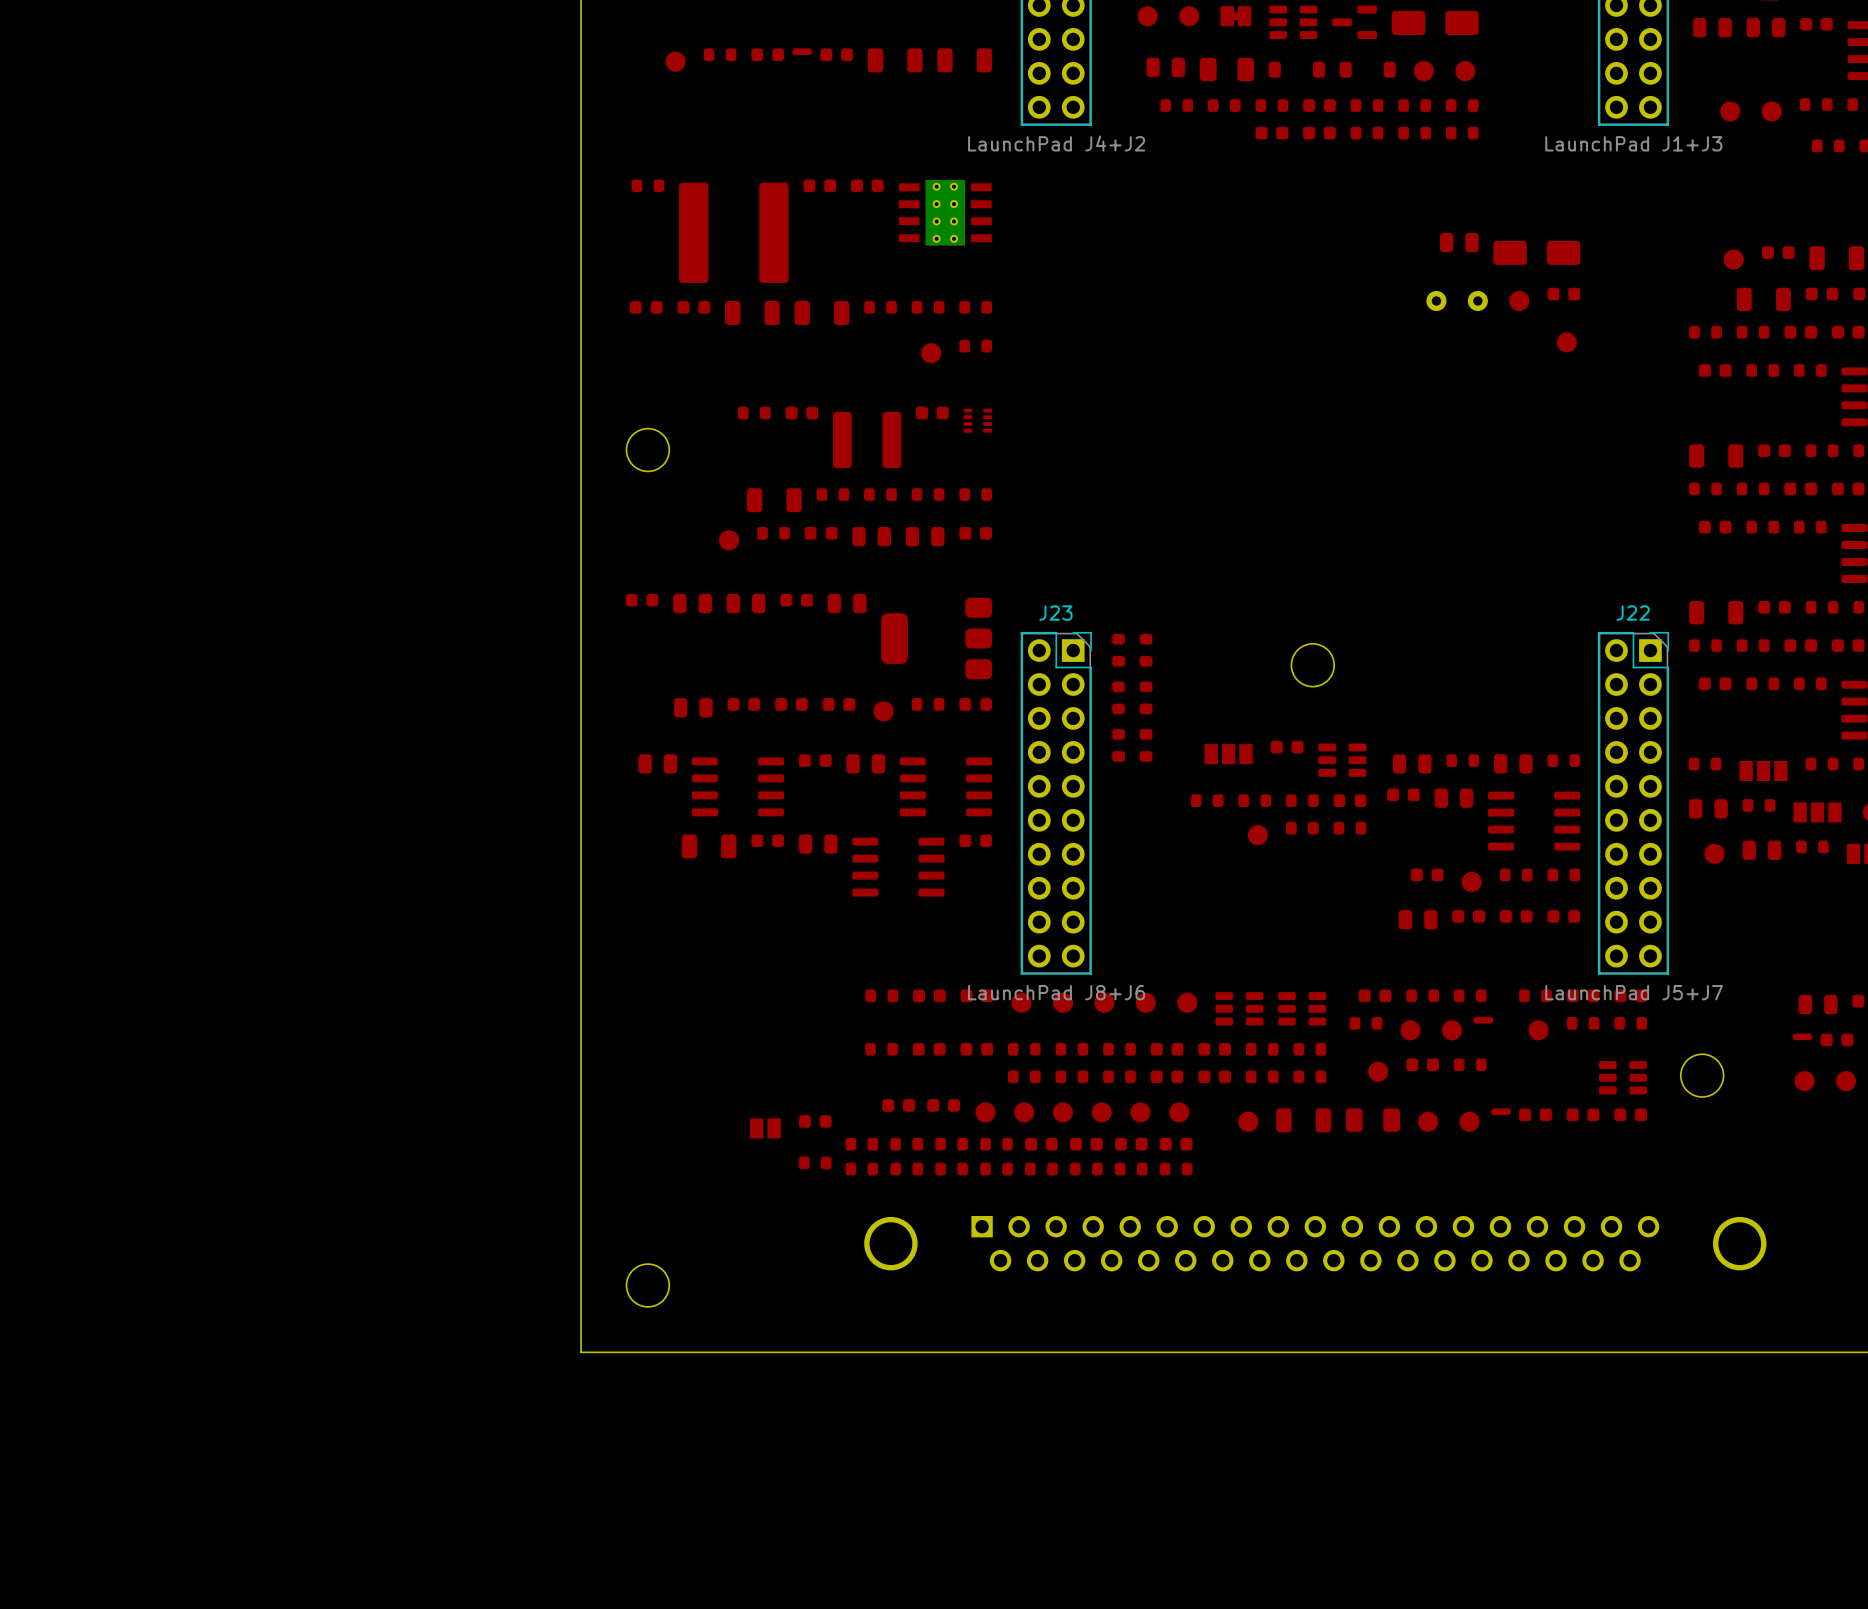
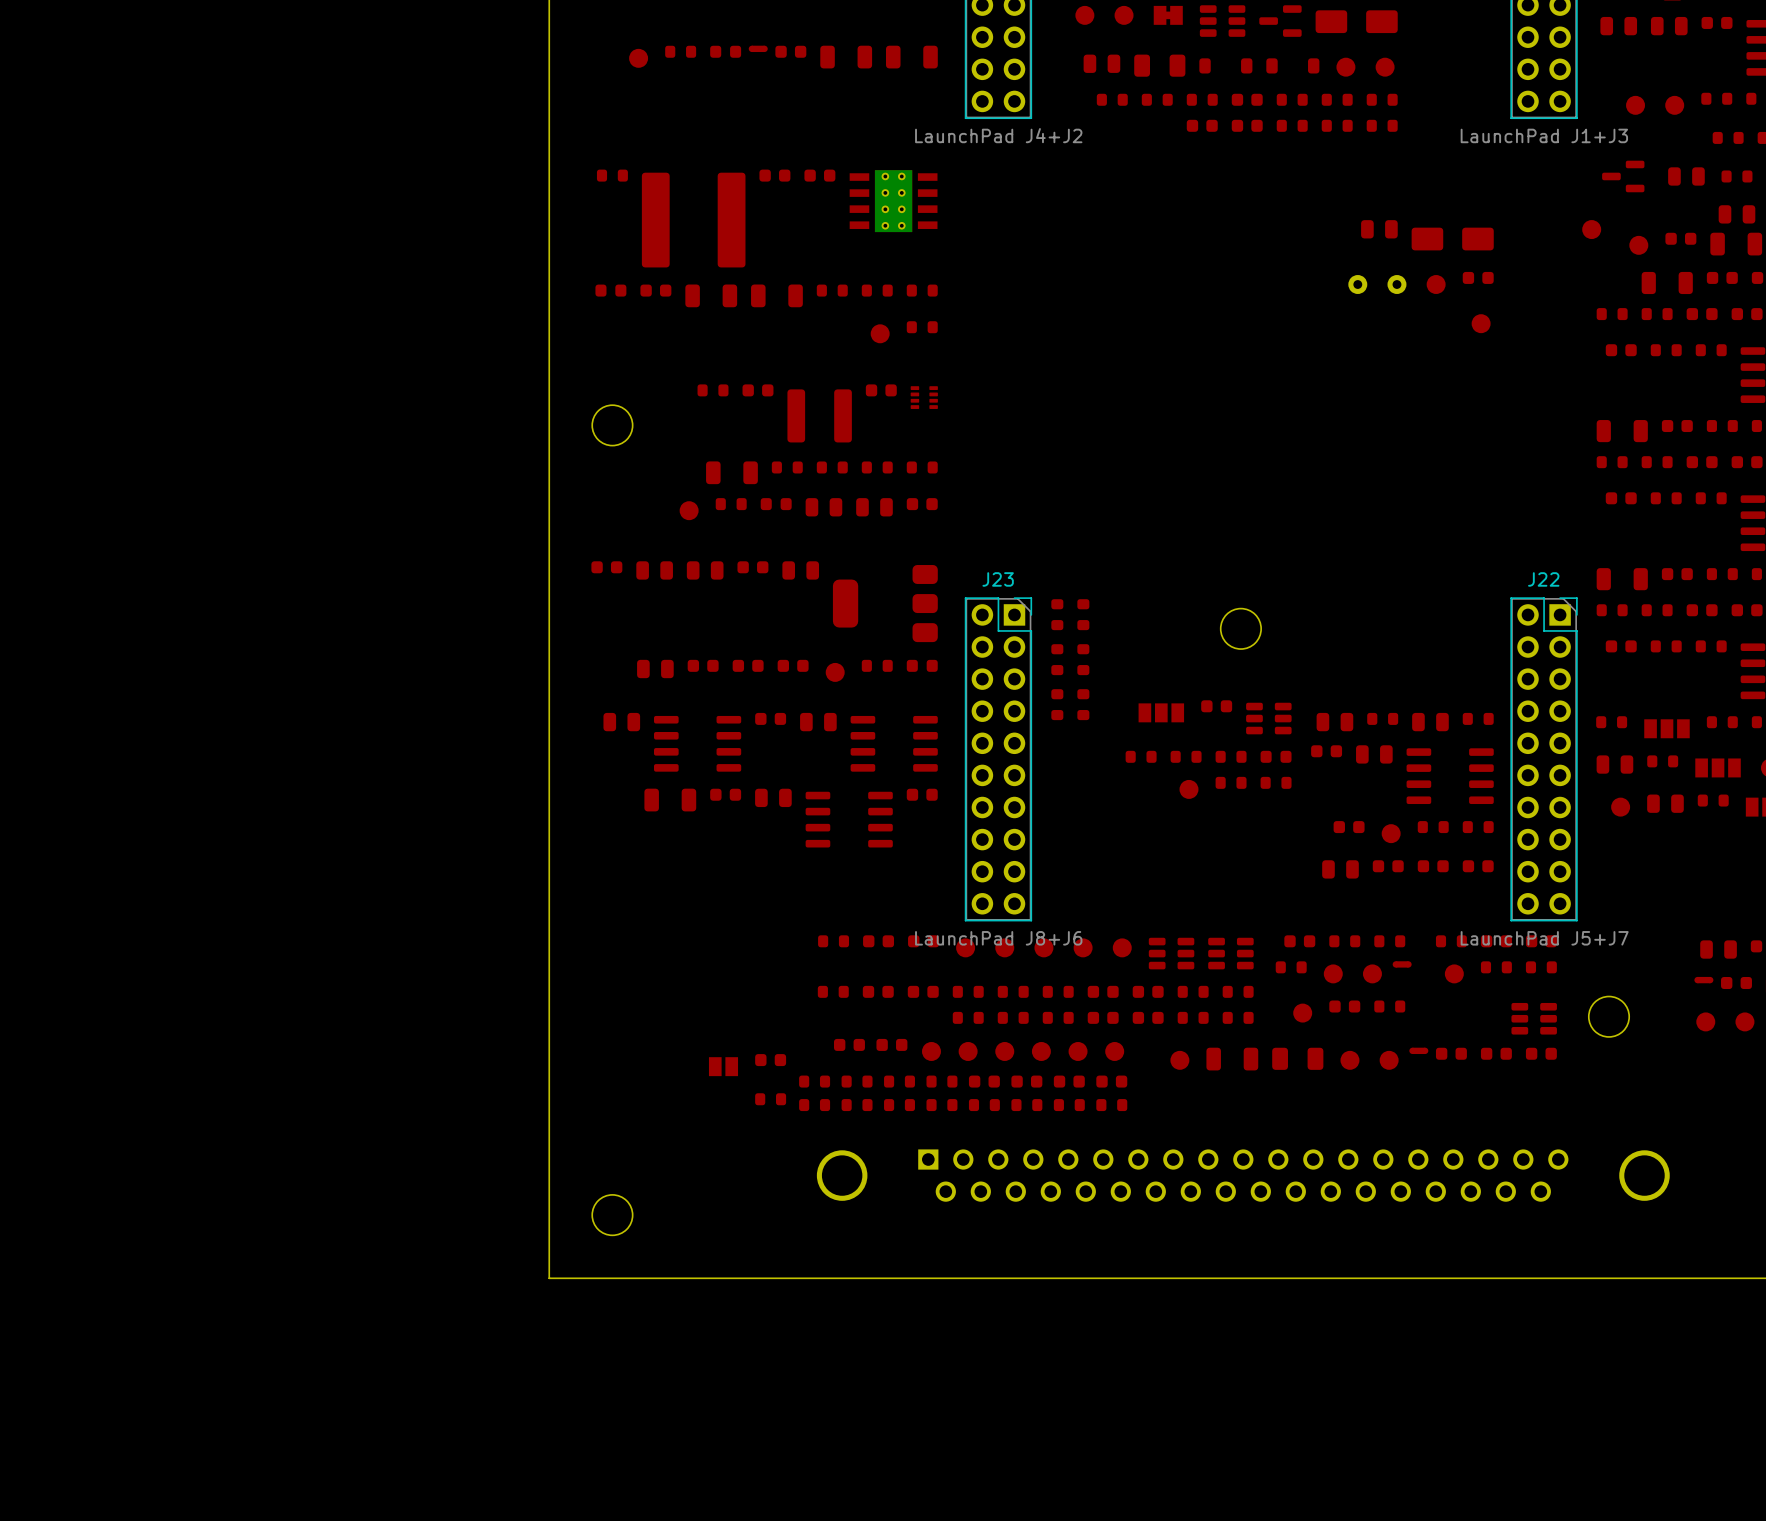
part: none -> (1623, 176)
part: none -> (1686, 176)
part: none -> (1736, 176)
part: none -> (1736, 214)
part: none -> (1591, 229)

